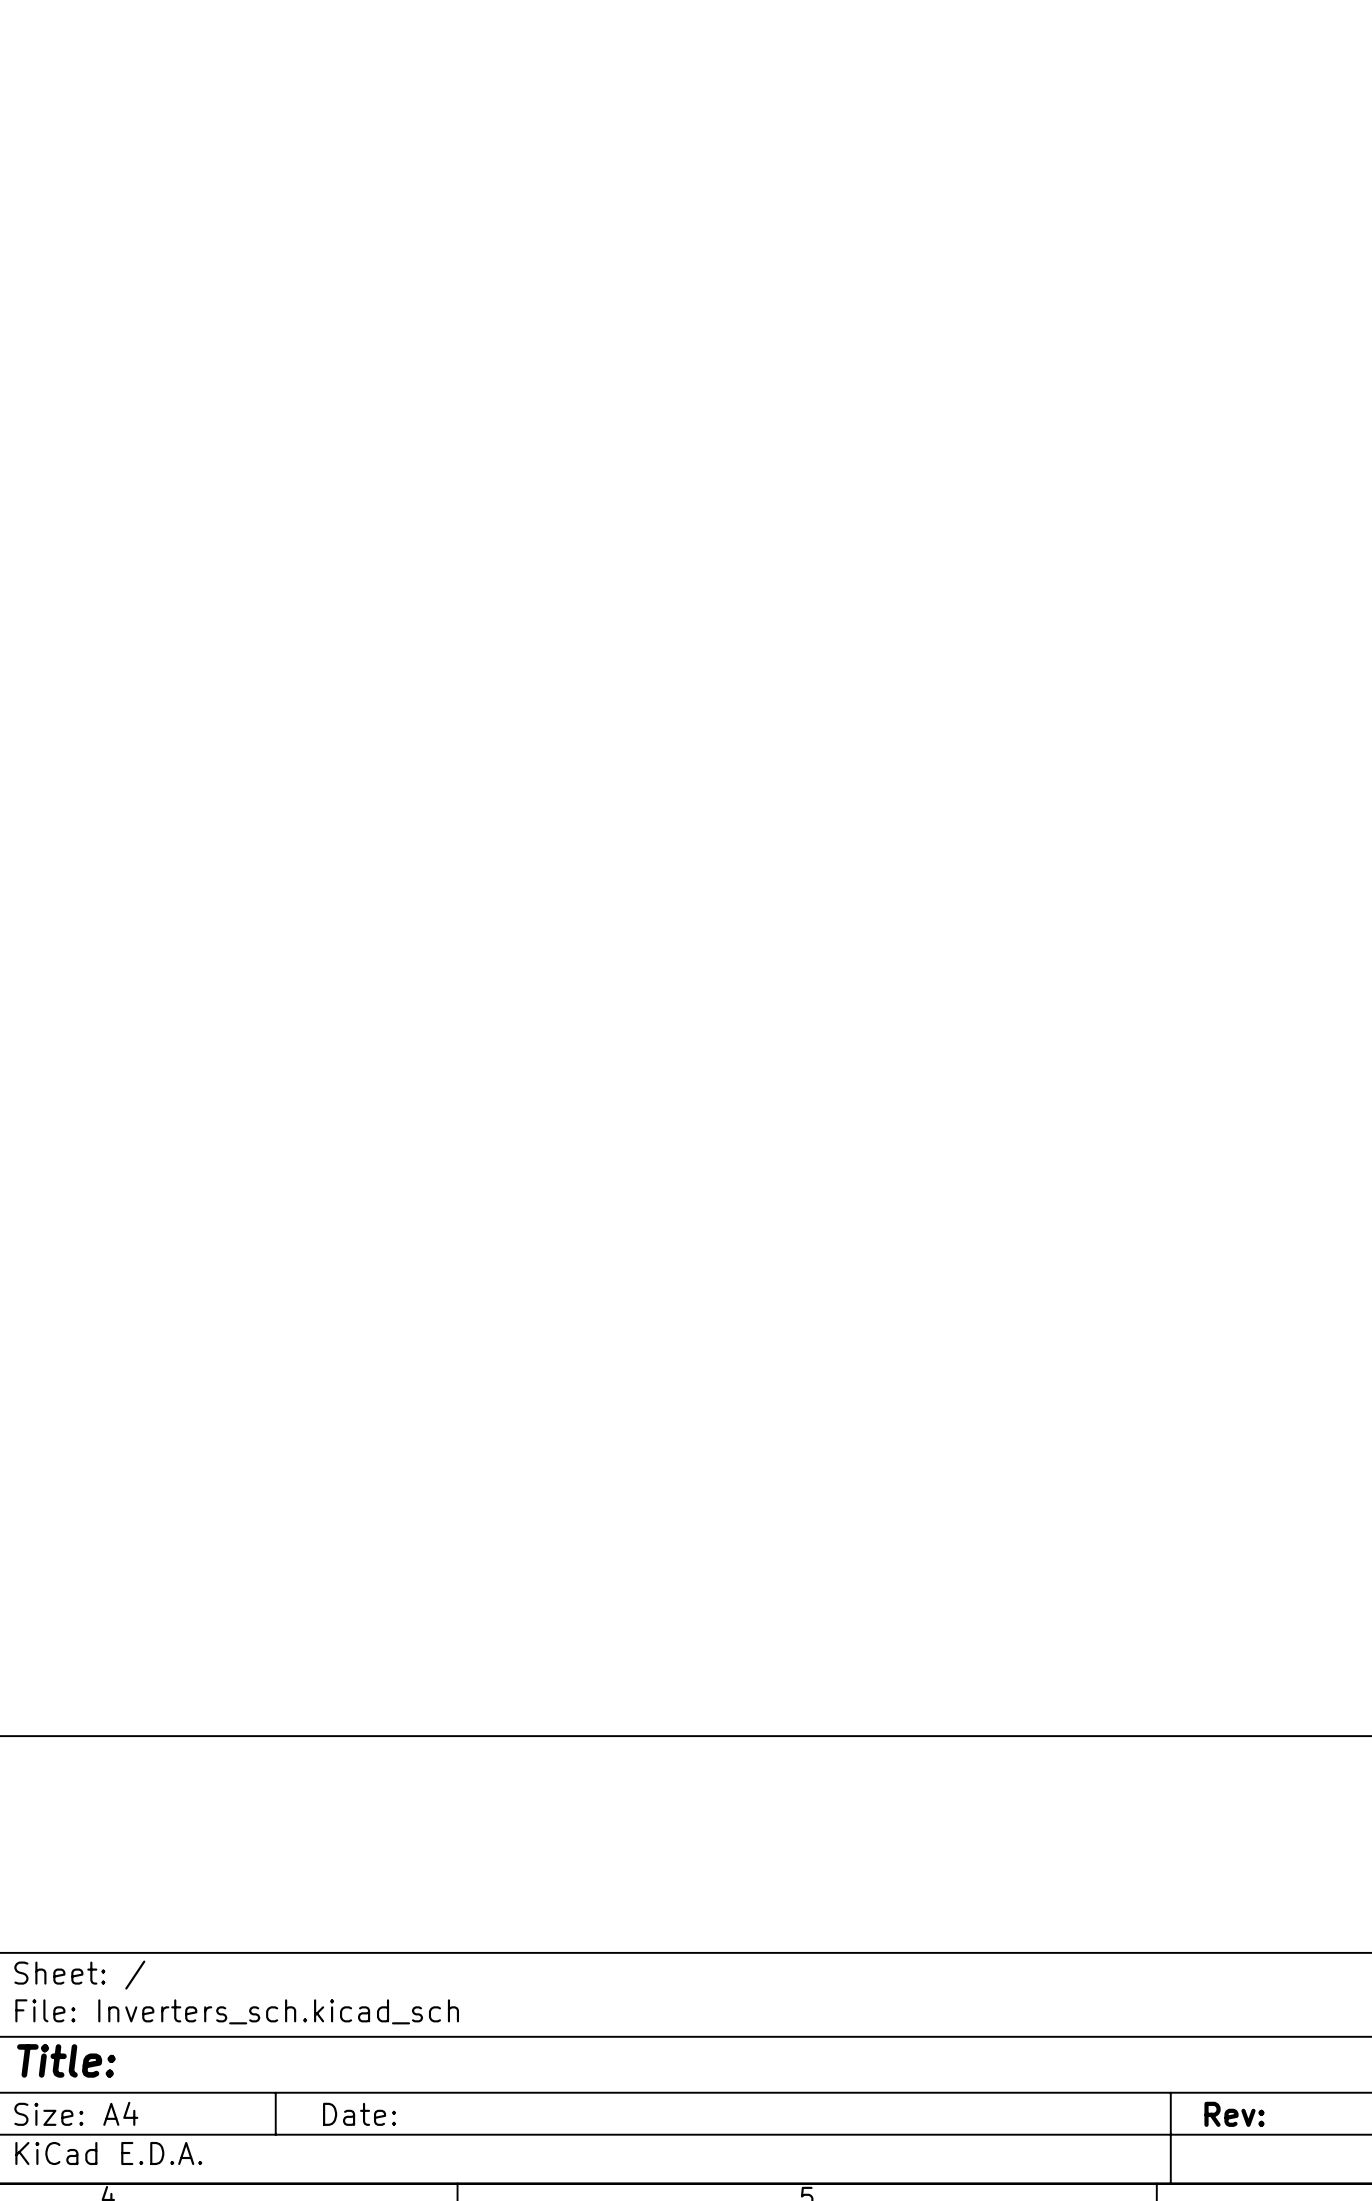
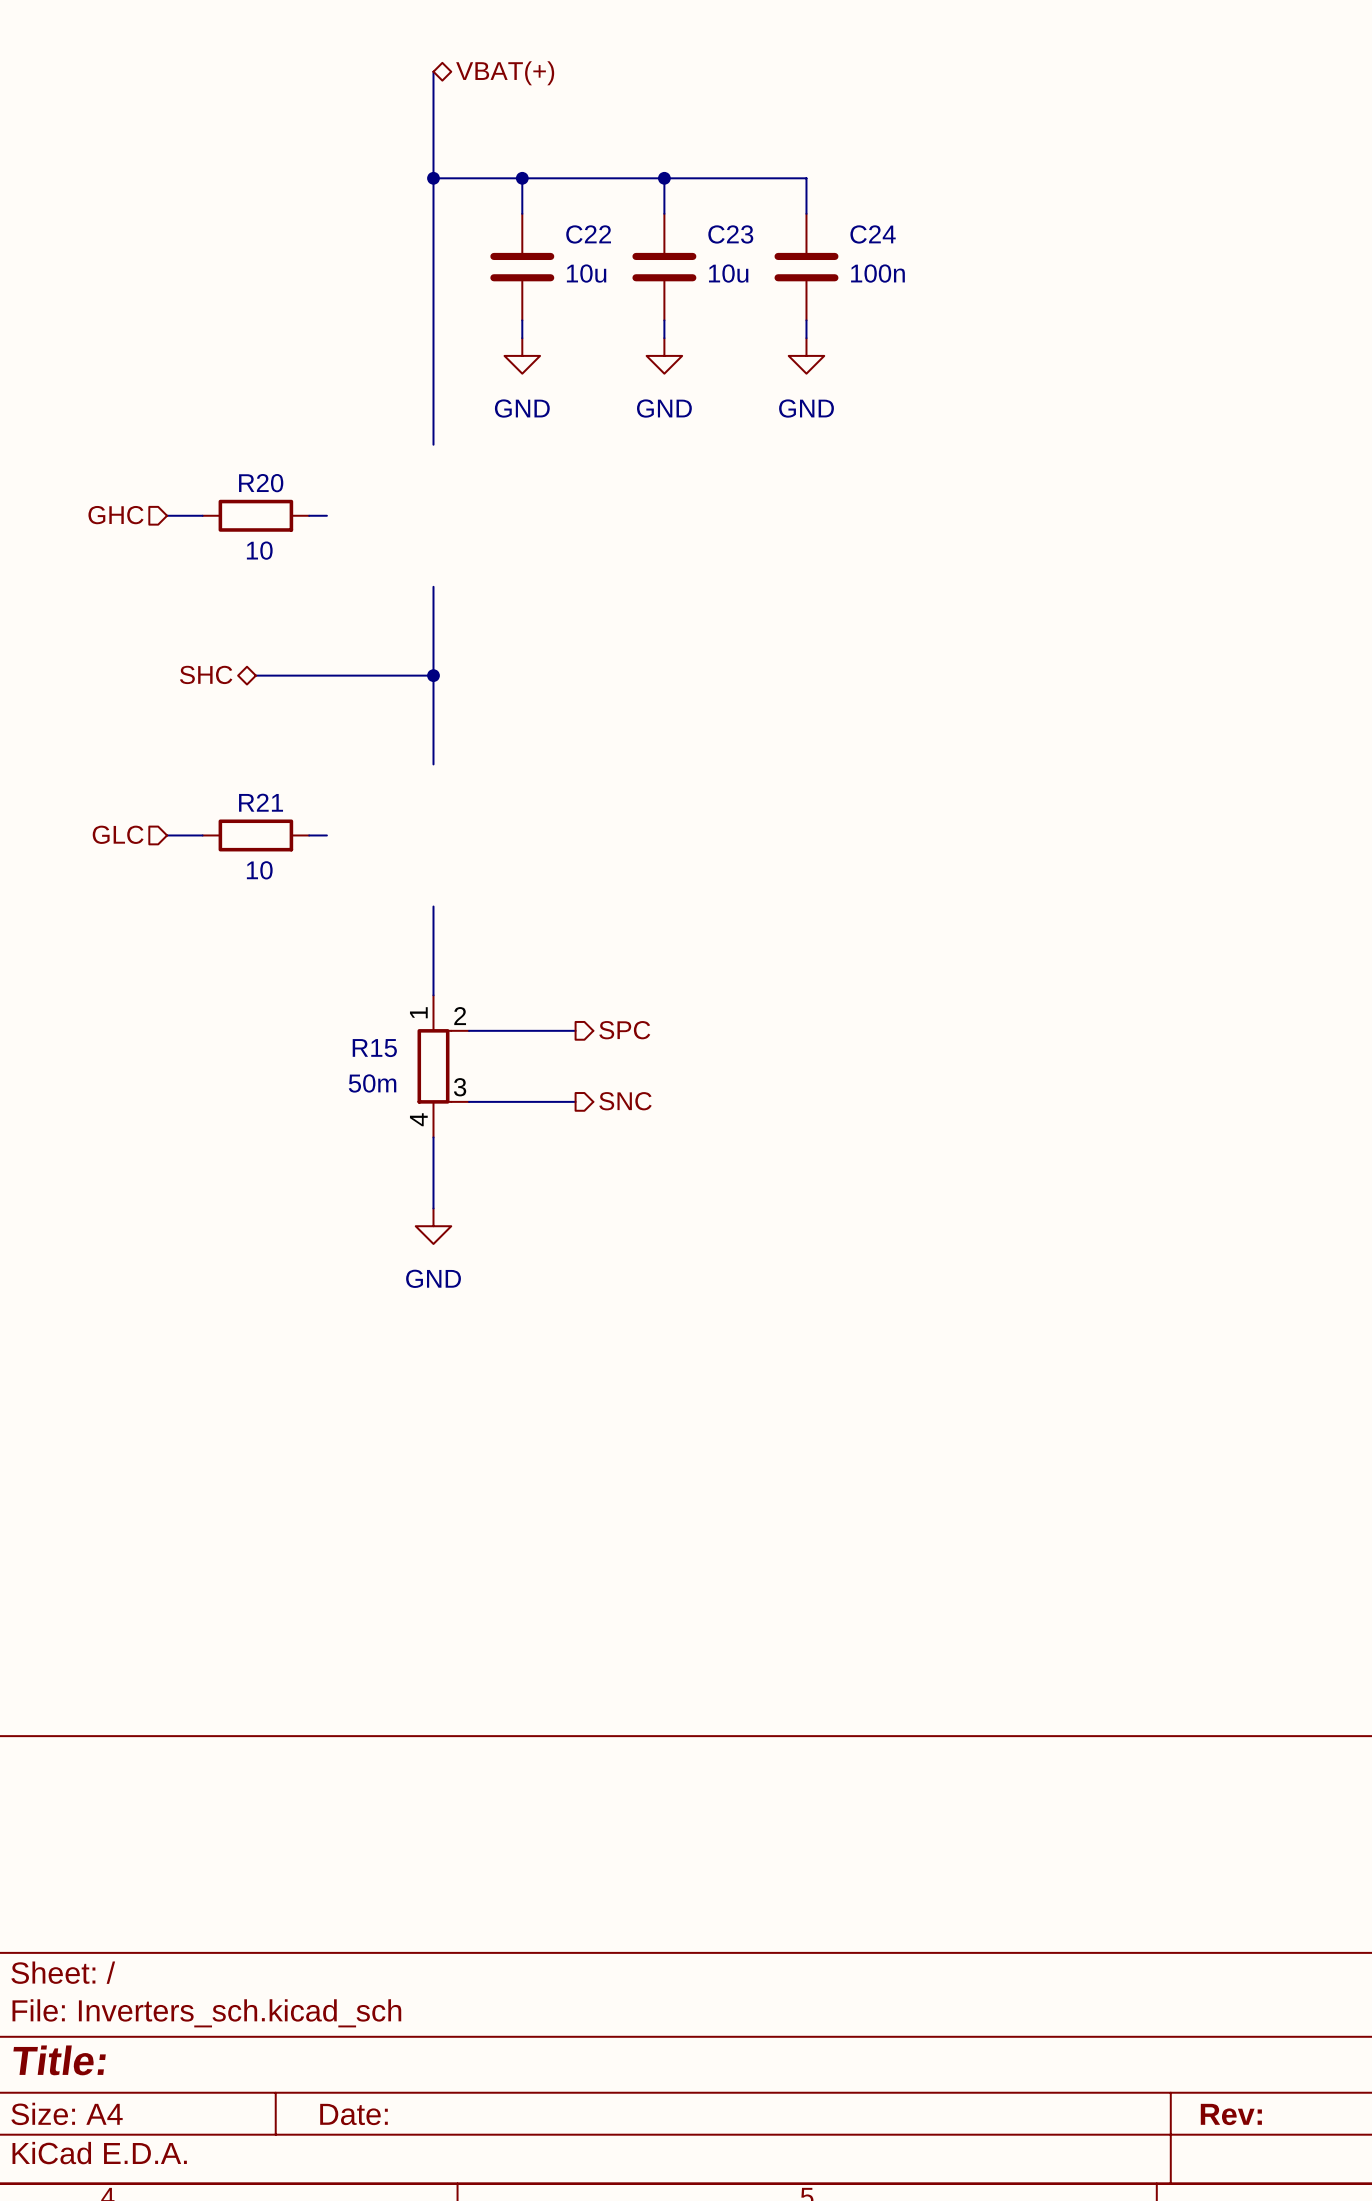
wire: none -> (433, 71) (433, 444)
hierarchical label: none -> VBAT(+) (505, 73)
wire: none -> (433, 178) (806, 178) (806, 213)
junction: none -> (433, 178)
wire: none -> (522, 178) (522, 213)
junction: none -> (522, 178)
wire: none -> (664, 178) (664, 213)
junction: none -> (664, 178)
C22: none -> 10u (522, 267)
C23: none -> 10u (664, 267)
C24: none -> 100n (806, 267)
wire: none -> (522, 320) (522, 338)
wire: none -> (664, 320) (664, 338)
wire: none -> (806, 320) (806, 338)
power symbol: none -> GND (522, 355)
power symbol: none -> GND (664, 355)
power symbol: none -> GND (806, 355)
hierarchical label: none -> GHC (115, 515)
wire: none -> (167, 515) (202, 515)
R20: none -> 10 (255, 515)
wire: none -> (309, 515) (326, 515)
wire: none -> (433, 586) (433, 764)
hierarchical label: none -> SHC (206, 674)
wire: none -> (255, 675) (433, 675)
junction: none -> (433, 675)
hierarchical label: none -> GLC (118, 834)
wire: none -> (167, 835) (202, 835)
R21: none -> 10 (255, 835)
wire: none -> (309, 835) (326, 835)
wire: none -> (433, 906) (433, 995)
wire: none -> (469, 1030) (575, 1030)
hierarchical label: none -> SPC (624, 1030)
R15: none -> 50m (443, 1066)
wire: none -> (469, 1101) (575, 1101)
hierarchical label: none -> SNC (625, 1101)
wire: none -> (433, 1137) (433, 1208)
power symbol: none -> GND (433, 1226)

